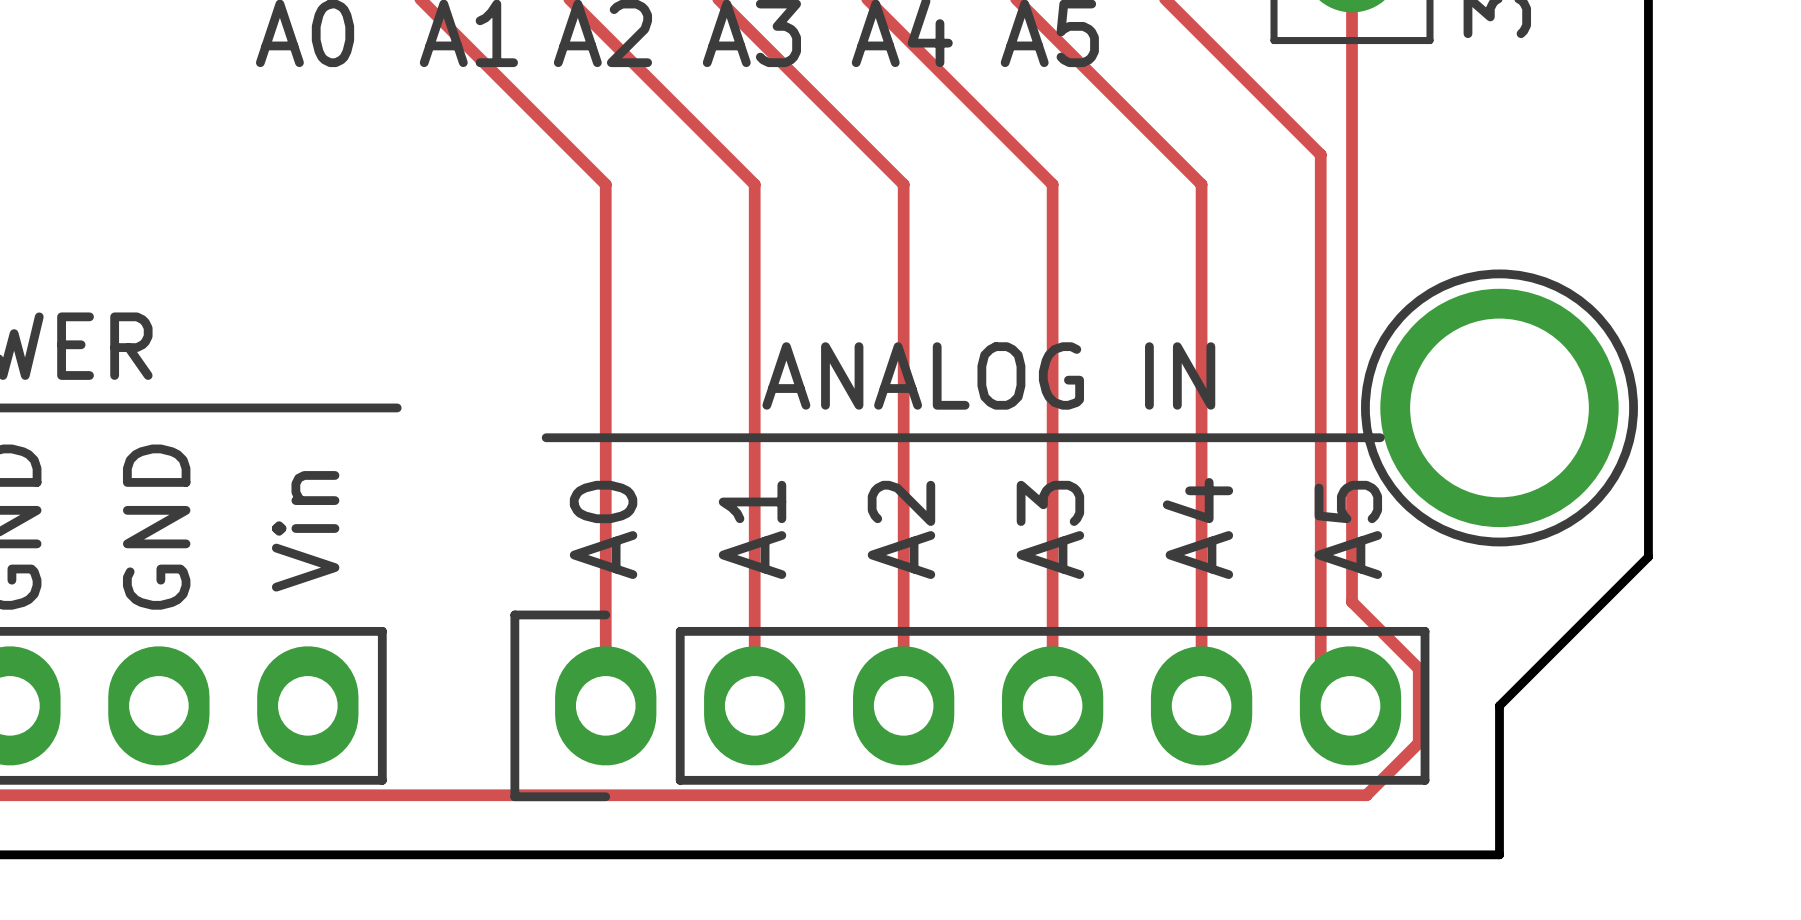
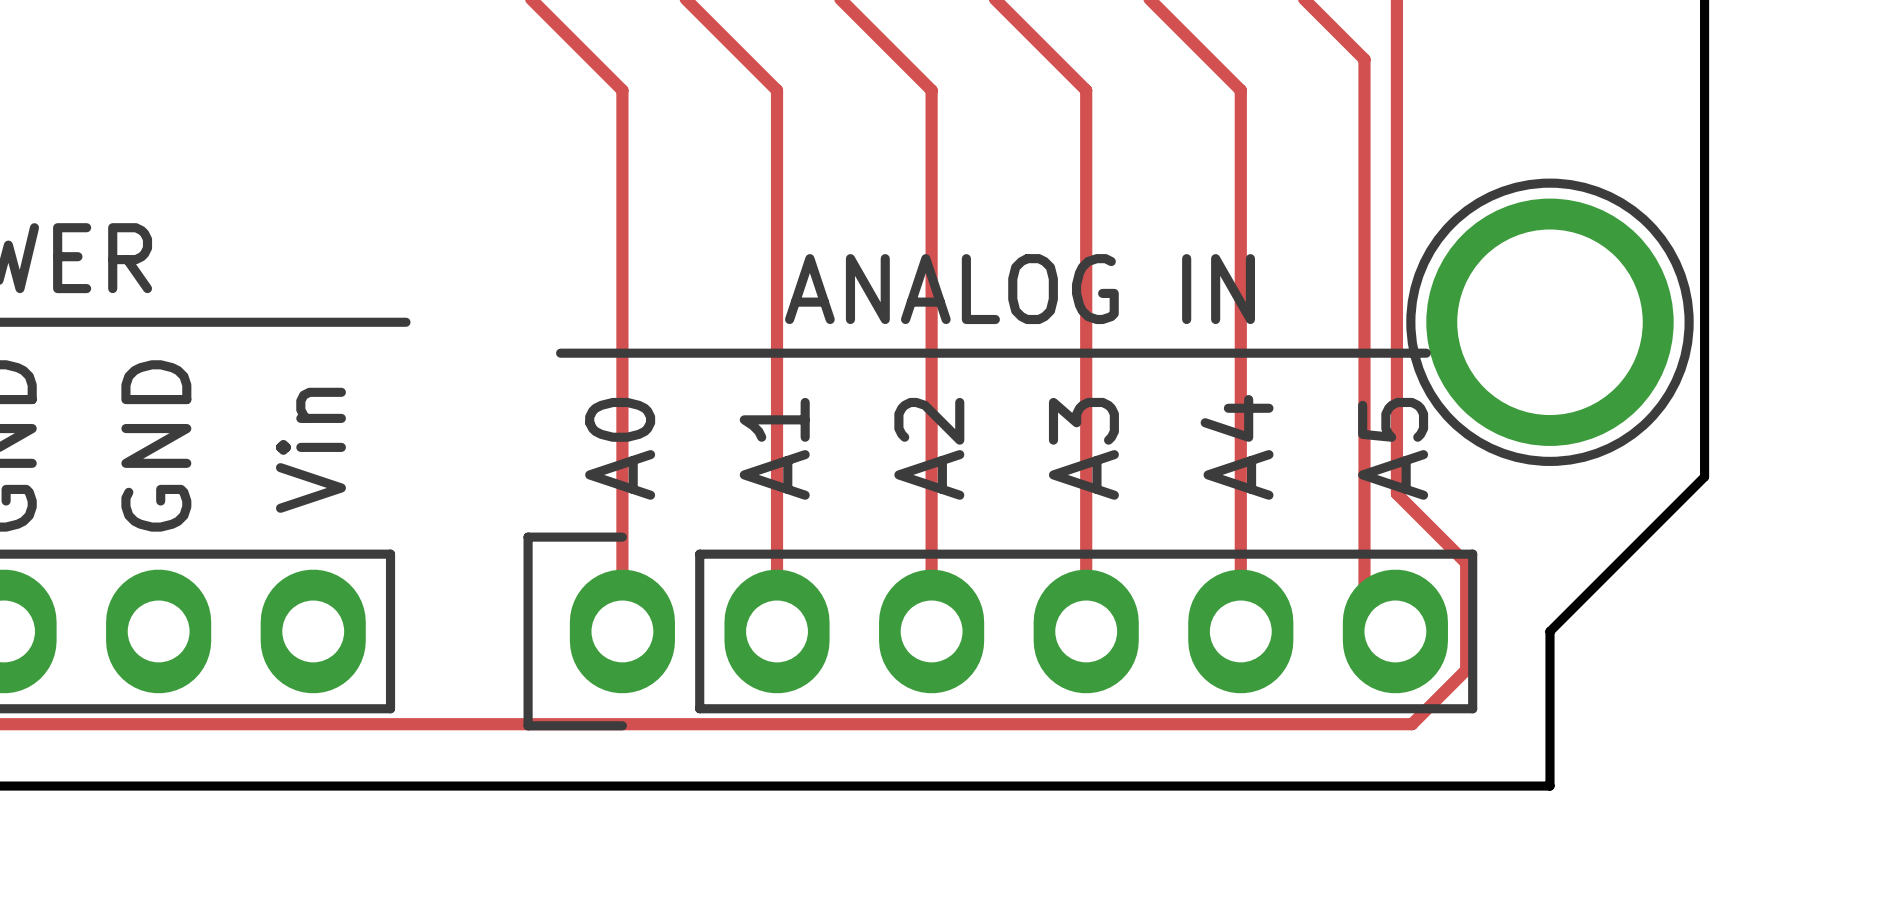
track: (1352, 573) (1352, 601) (1418, 668) -> (1396, 493) (1466, 563) (1466, 592)

